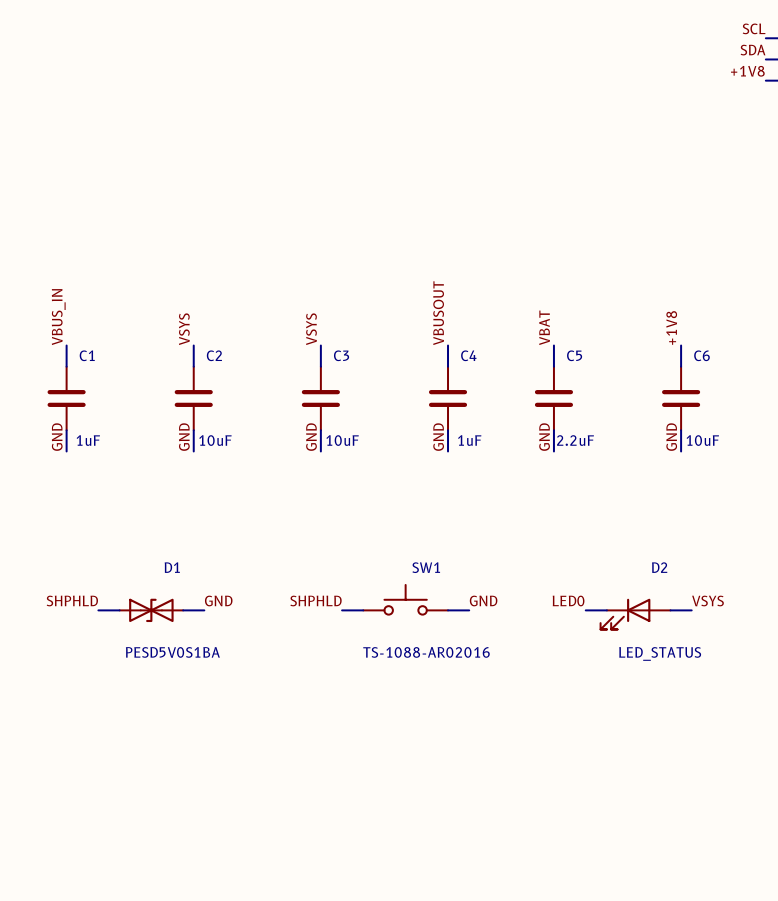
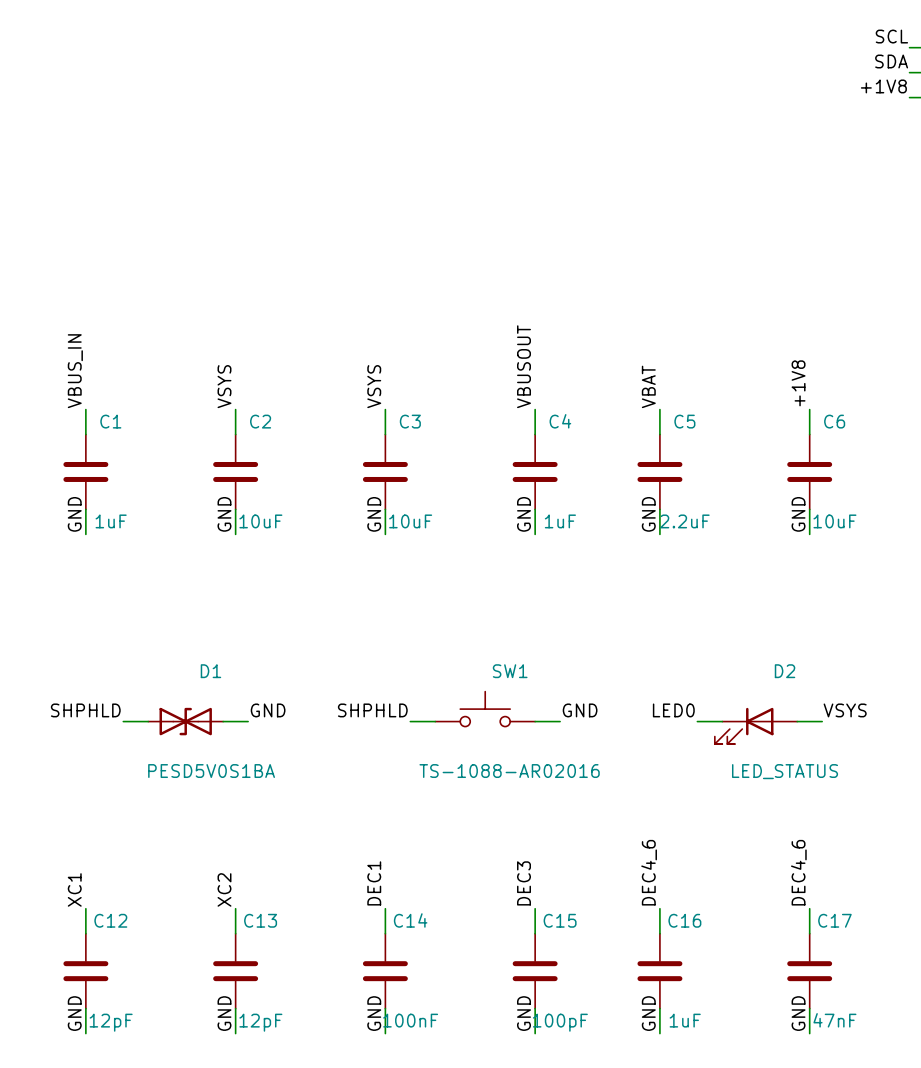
label: none -> DEC4_6 (649, 872)
label: none -> DEC4_6 (798, 872)
label: none -> DEC1 (374, 883)
label: none -> DEC3 (524, 883)
label: none -> XC1 (74, 889)
label: none -> XC2 (224, 889)
wire: none -> (85, 908) (85, 933)
wire: none -> (235, 908) (235, 933)
wire: none -> (385, 908) (385, 933)
wire: none -> (535, 908) (535, 933)
wire: none -> (659, 908) (659, 933)
wire: none -> (809, 908) (809, 933)
C12: none -> 12pF (85, 971)
C13: none -> 12pF (235, 971)
C14: none -> 100nF (385, 971)
C15: none -> 100pF (535, 971)
C16: none -> 1uF (659, 971)
C17: none -> 47nF (809, 971)
wire: none -> (85, 1008) (85, 1033)
wire: none -> (235, 1008) (235, 1033)
wire: none -> (385, 1008) (385, 1033)
wire: none -> (535, 1008) (535, 1033)
wire: none -> (659, 1008) (659, 1033)
wire: none -> (809, 1008) (809, 1033)
label: none -> GND (74, 1013)
label: none -> GND (224, 1013)
label: none -> GND (374, 1013)
label: none -> GND (524, 1013)
label: none -> GND (648, 1013)
label: none -> GND (798, 1013)

